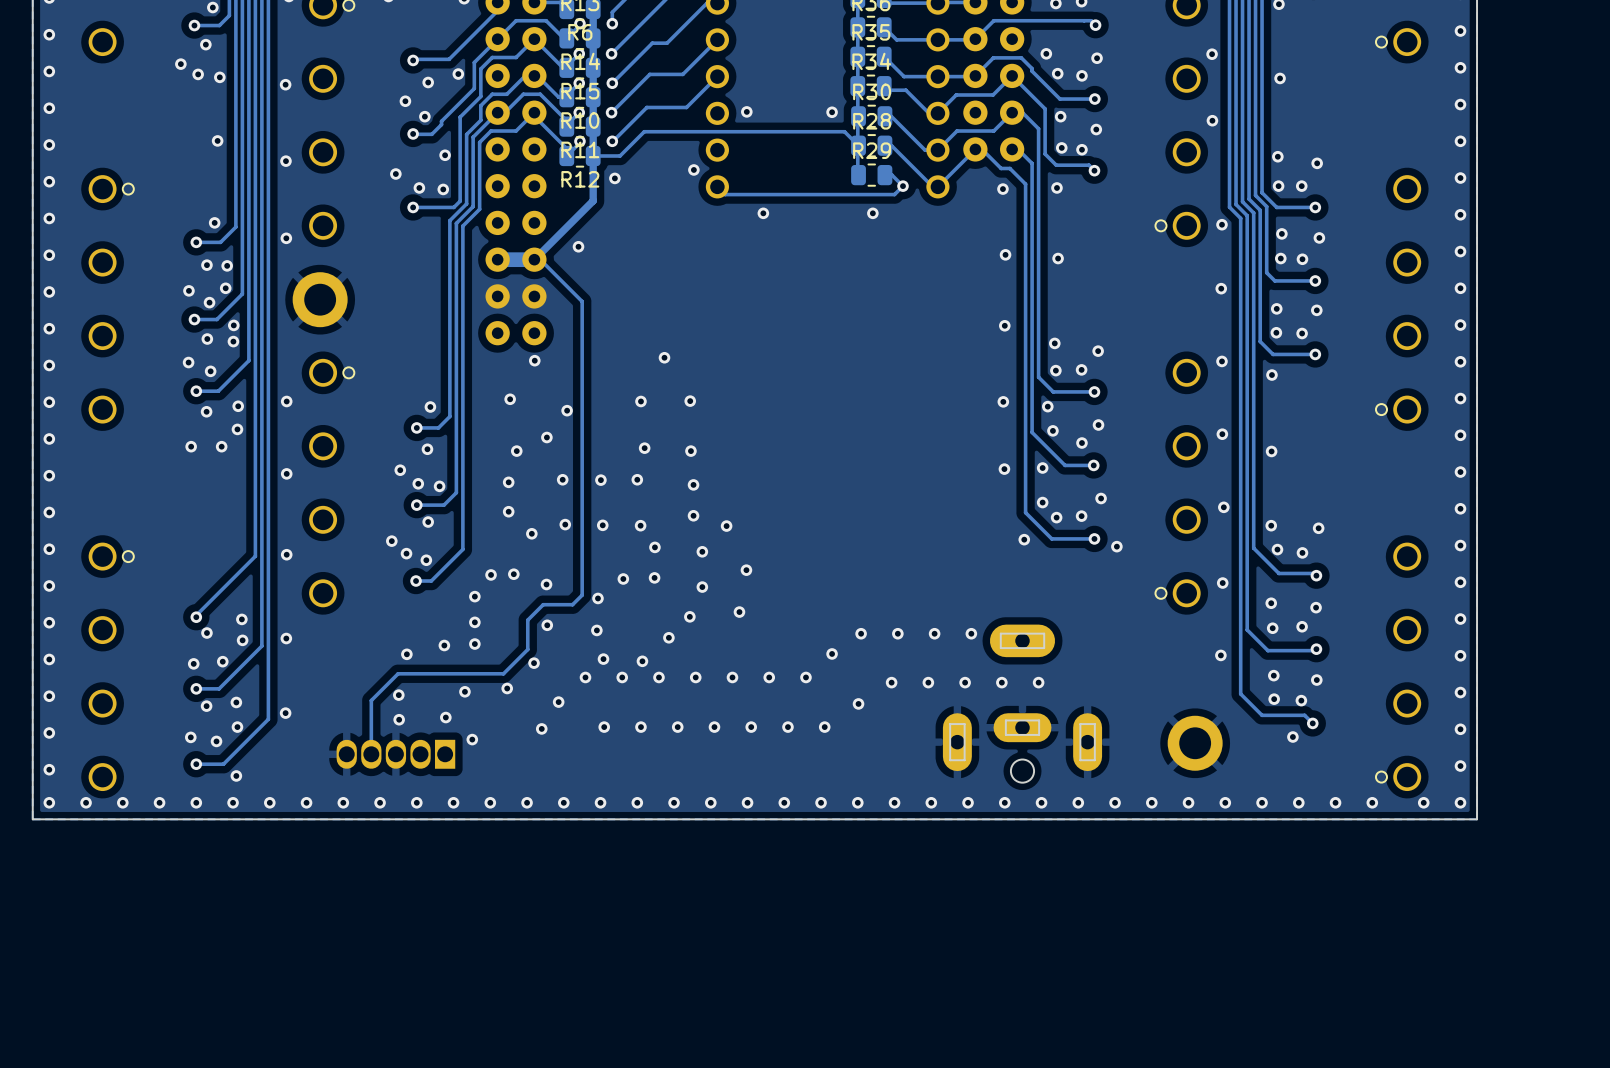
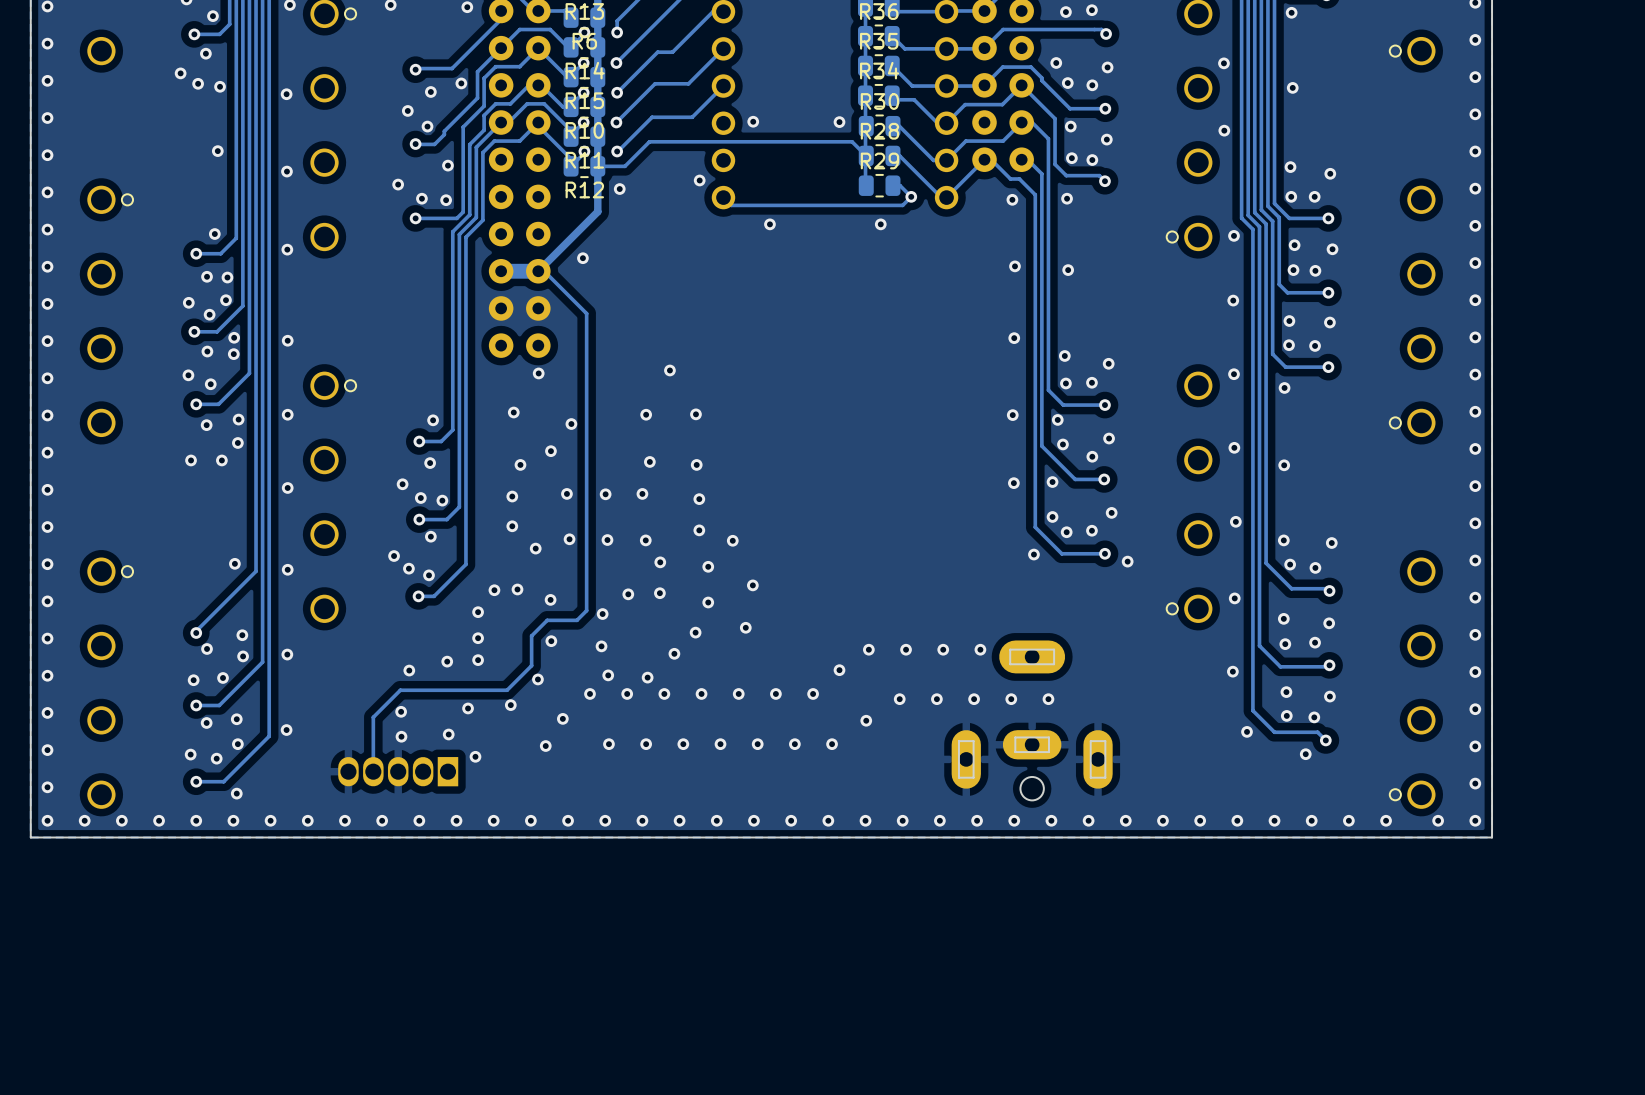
part: (320, 299) -> none
via: none -> (287, 340)
via: none -> (234, 563)
via: none -> (1247, 731)
part: (1195, 743) -> none

